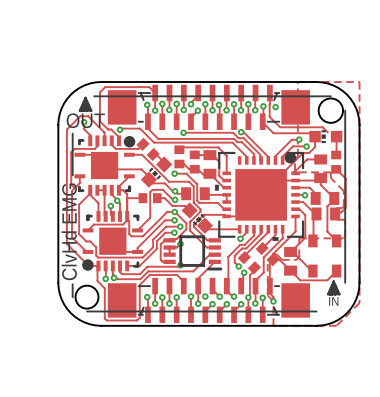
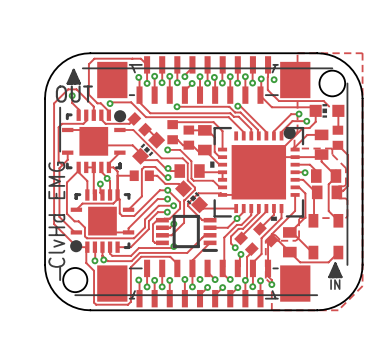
track: (190, 221) (190, 230) (206, 247) (214, 247) -> (237, 218) (227, 227) (210, 227)
track: (169, 247) (169, 254) -> (184, 200) (184, 222) (171, 235) (162, 235)

